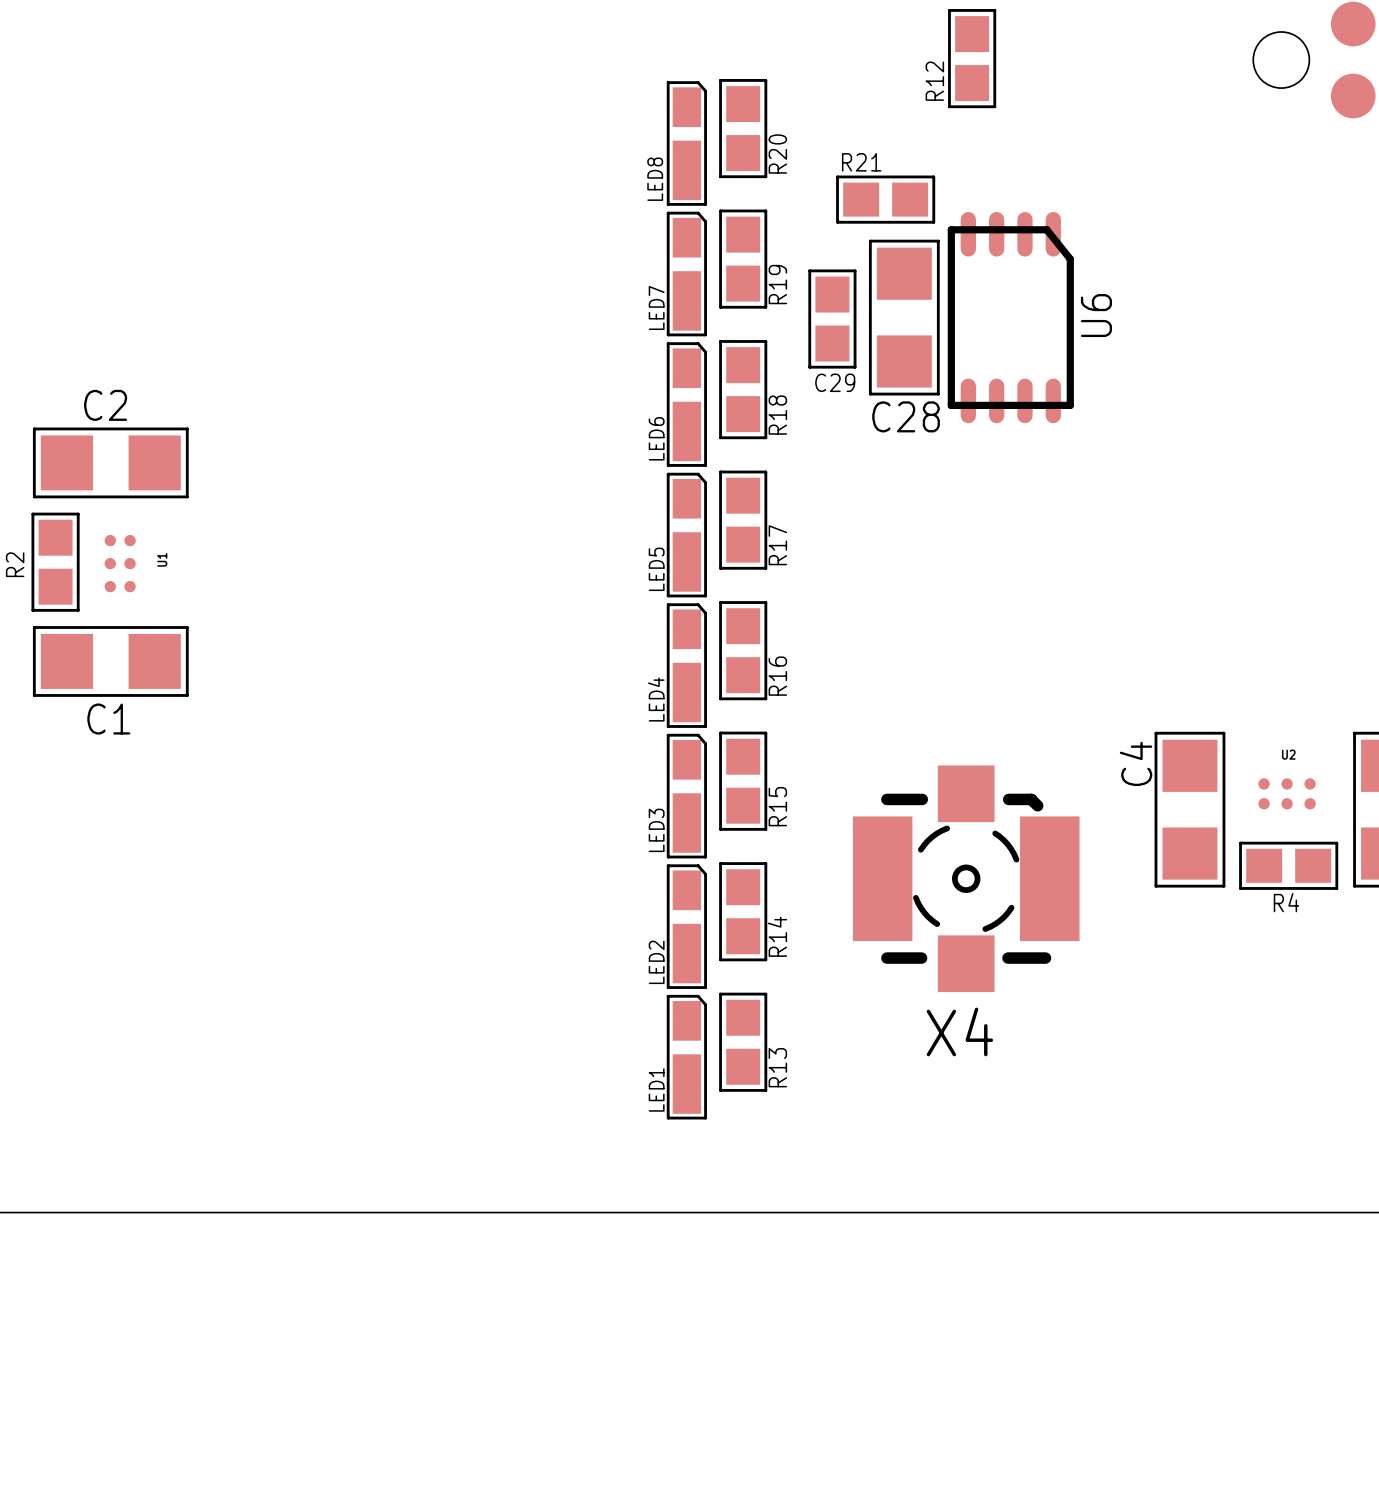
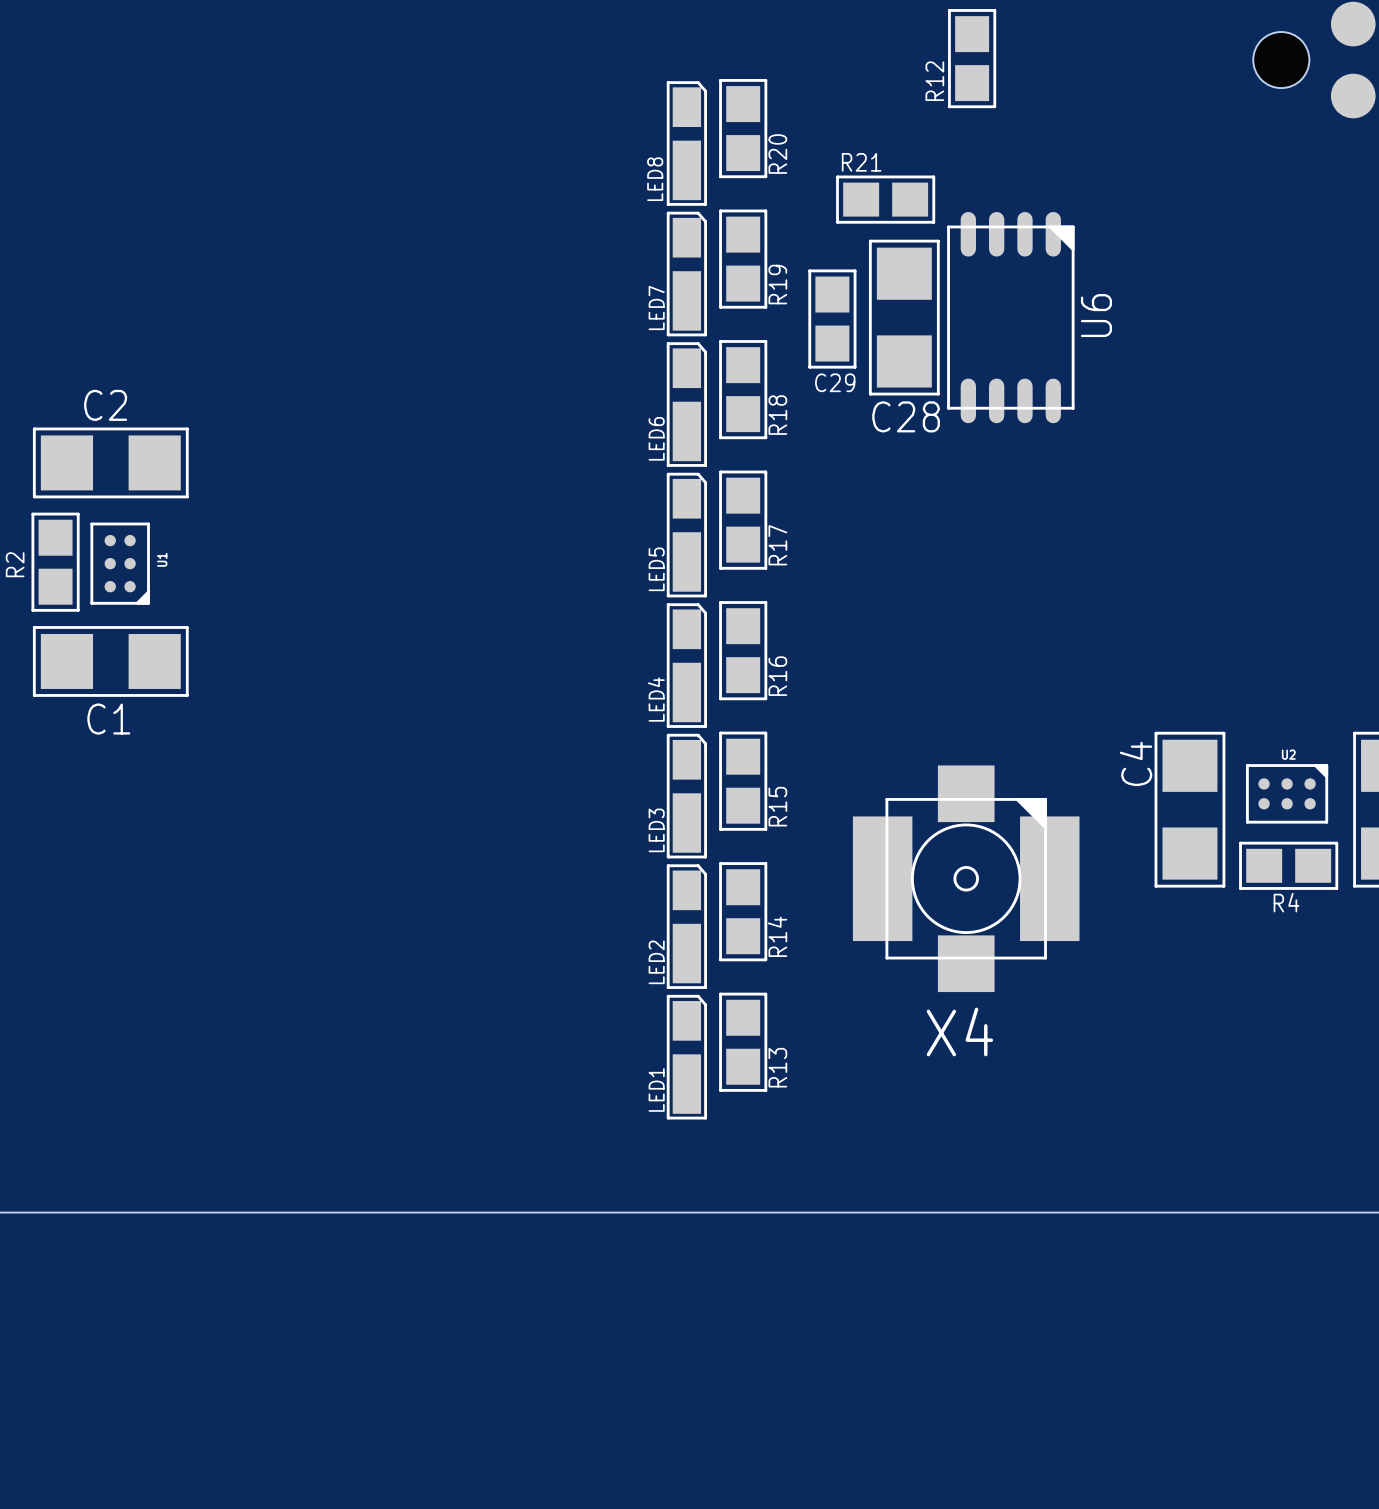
U6 footprint: [947, 211, 1074, 424] -> [947, 211, 1075, 424]
U1 footprint: [104, 534, 136, 593] -> [90, 522, 150, 605]
X4 footprint: [852, 765, 1080, 993] -> [852, 765, 1080, 993]
U2 footprint: [1258, 778, 1316, 810] -> [1246, 764, 1329, 824]

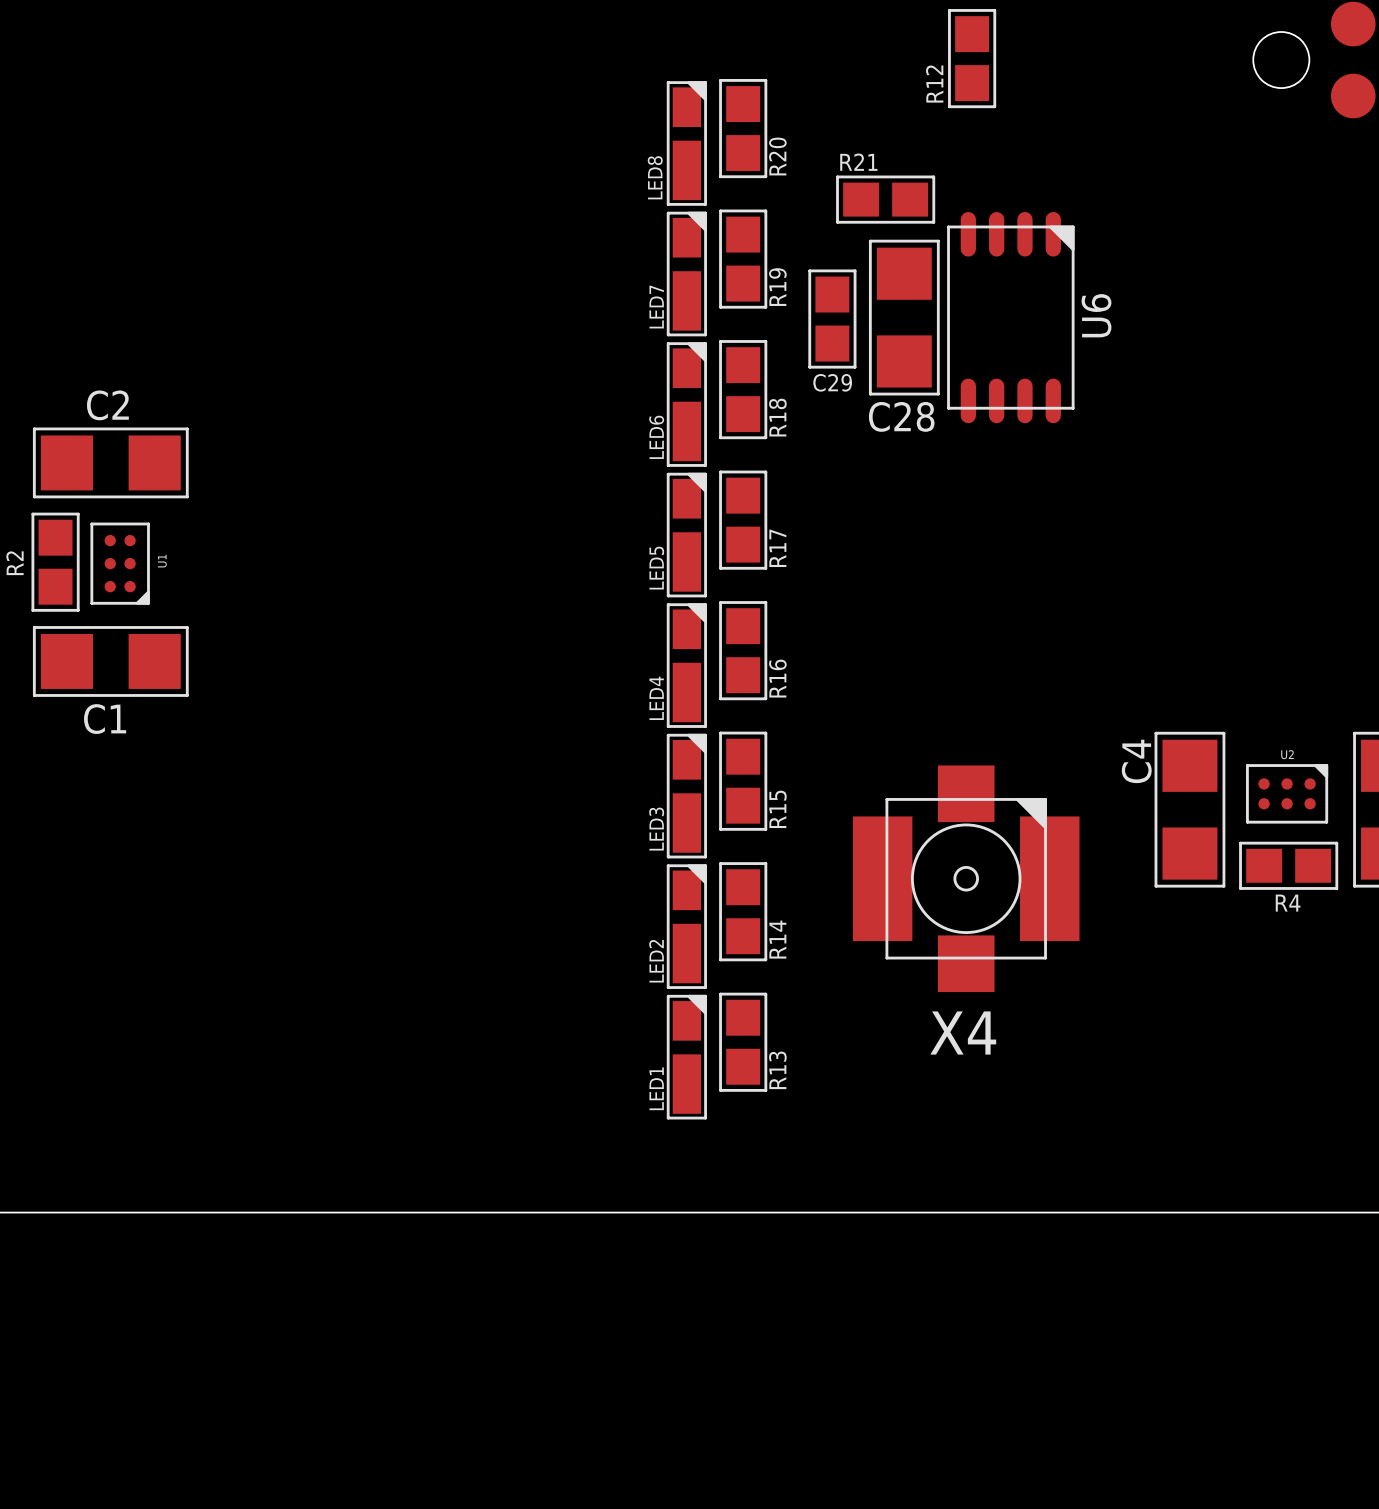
LED8 footprint: [666, 81, 707, 206] -> [666, 81, 707, 206]
LED7 footprint: [666, 211, 707, 337] -> [666, 211, 707, 337]
LED6 footprint: [666, 342, 707, 467] -> [666, 342, 707, 467]
LED5 footprint: [666, 472, 707, 598] -> [666, 472, 707, 598]
LED4 footprint: [666, 603, 707, 728] -> [666, 603, 707, 728]
LED3 footprint: [666, 733, 707, 859] -> [666, 733, 707, 859]
LED2 footprint: [666, 864, 707, 989] -> [666, 864, 707, 989]
LED1 footprint: [666, 994, 707, 1120] -> [666, 994, 707, 1120]

